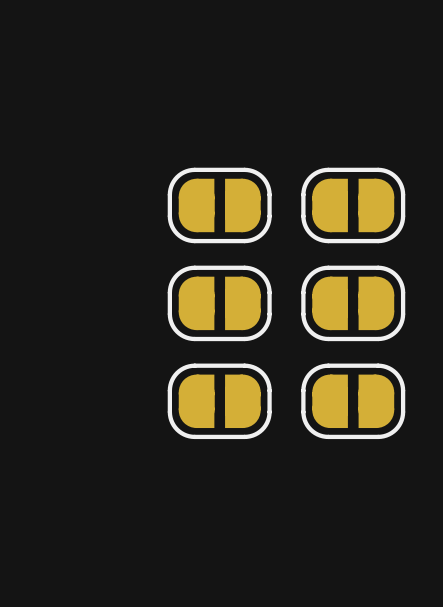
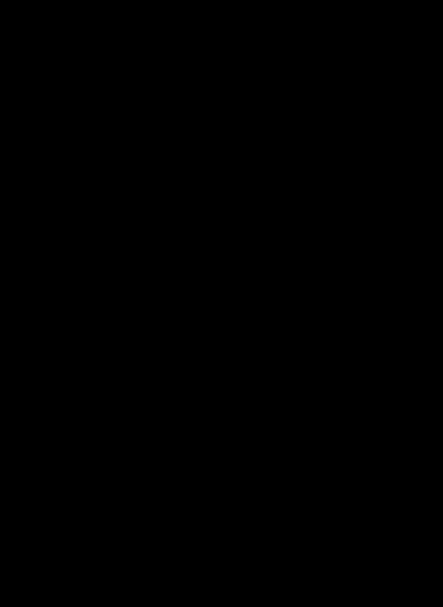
part: (219, 205) -> none
part: (353, 205) -> none
part: (219, 303) -> none
part: (353, 303) -> none
part: (219, 401) -> none
part: (353, 401) -> none

